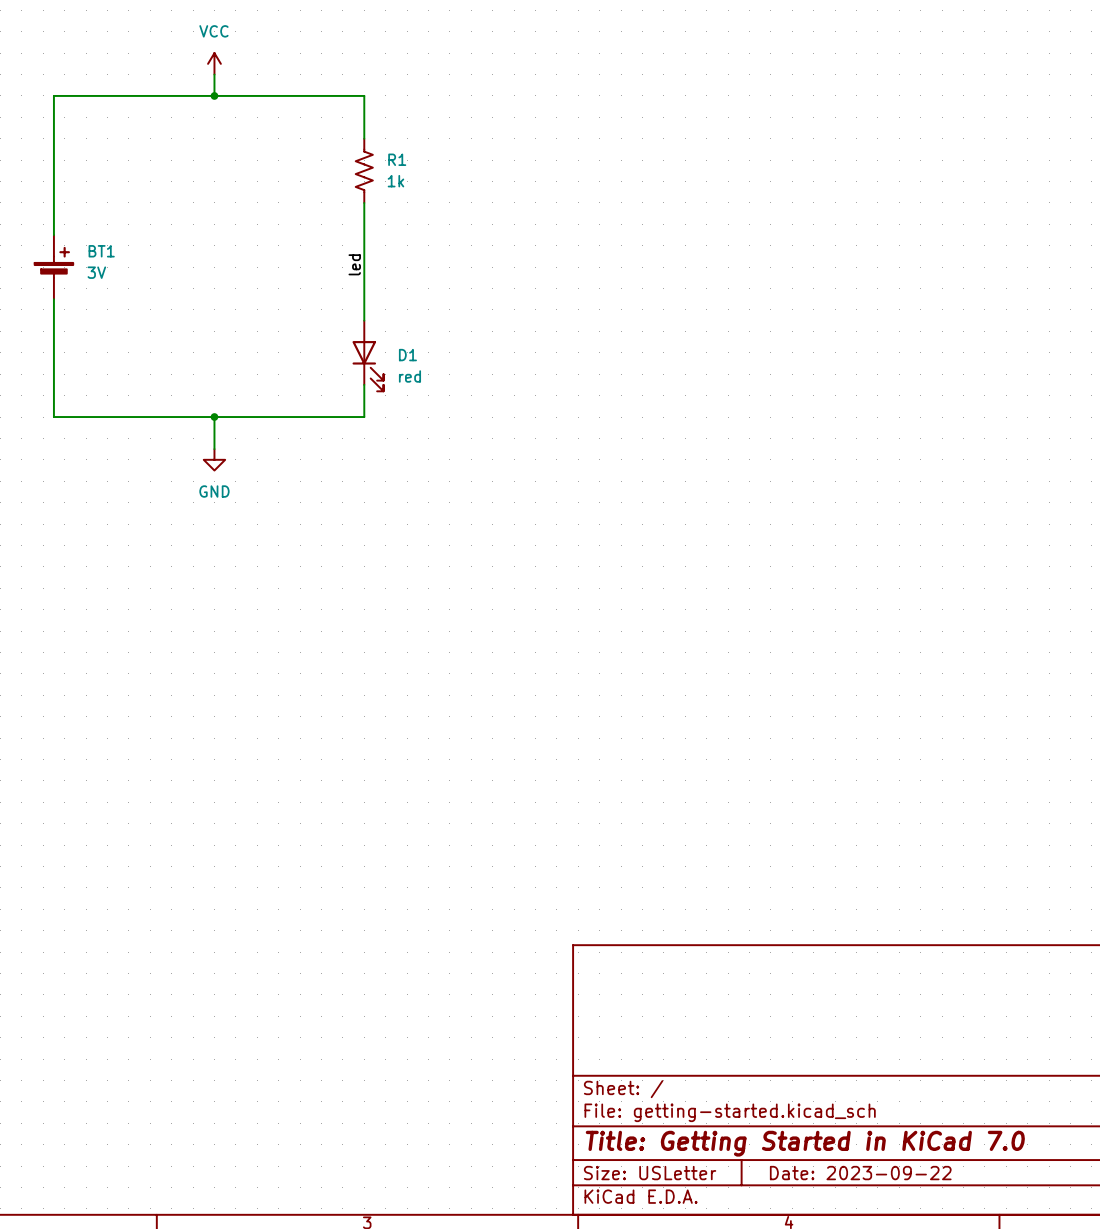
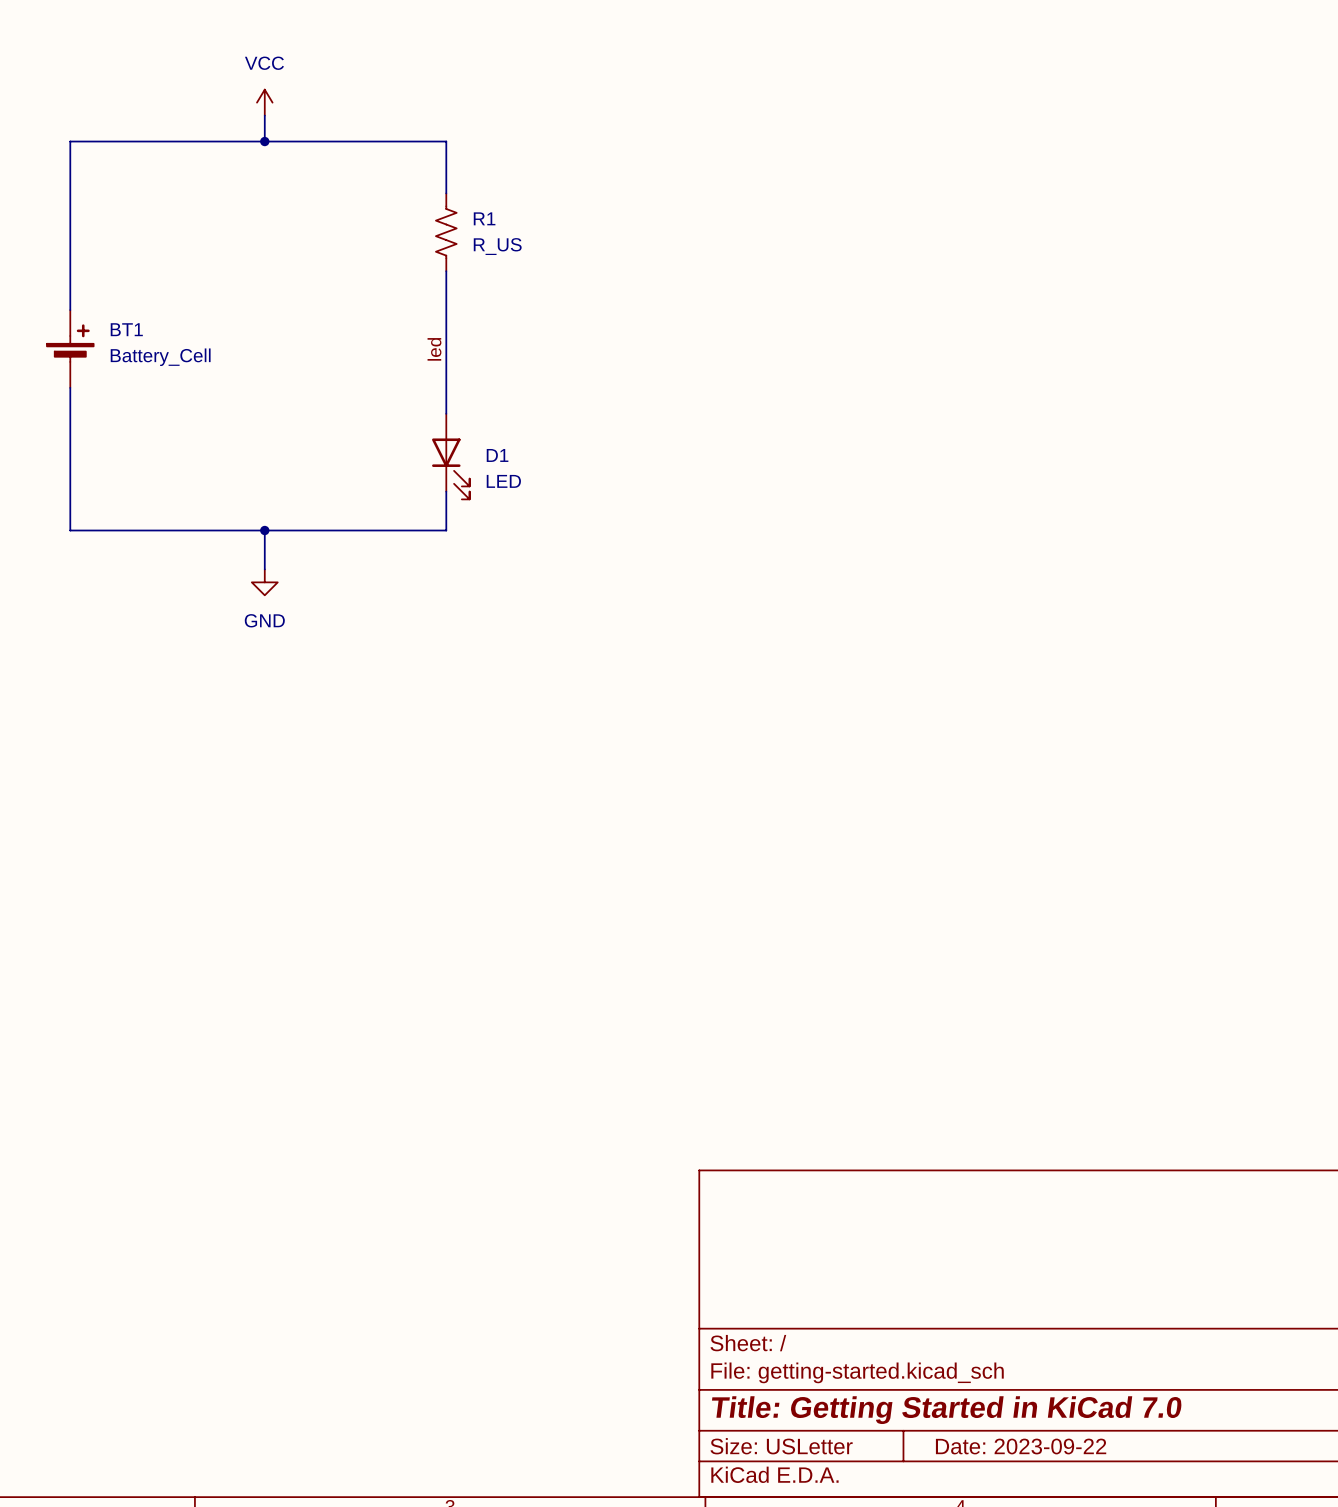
R1 value: 1k (395, 181) -> R_US (497, 246)
BT1 value: 3V (96, 272) -> Battery_Cell (160, 357)
D1 value: red (409, 376) -> LED (503, 481)

